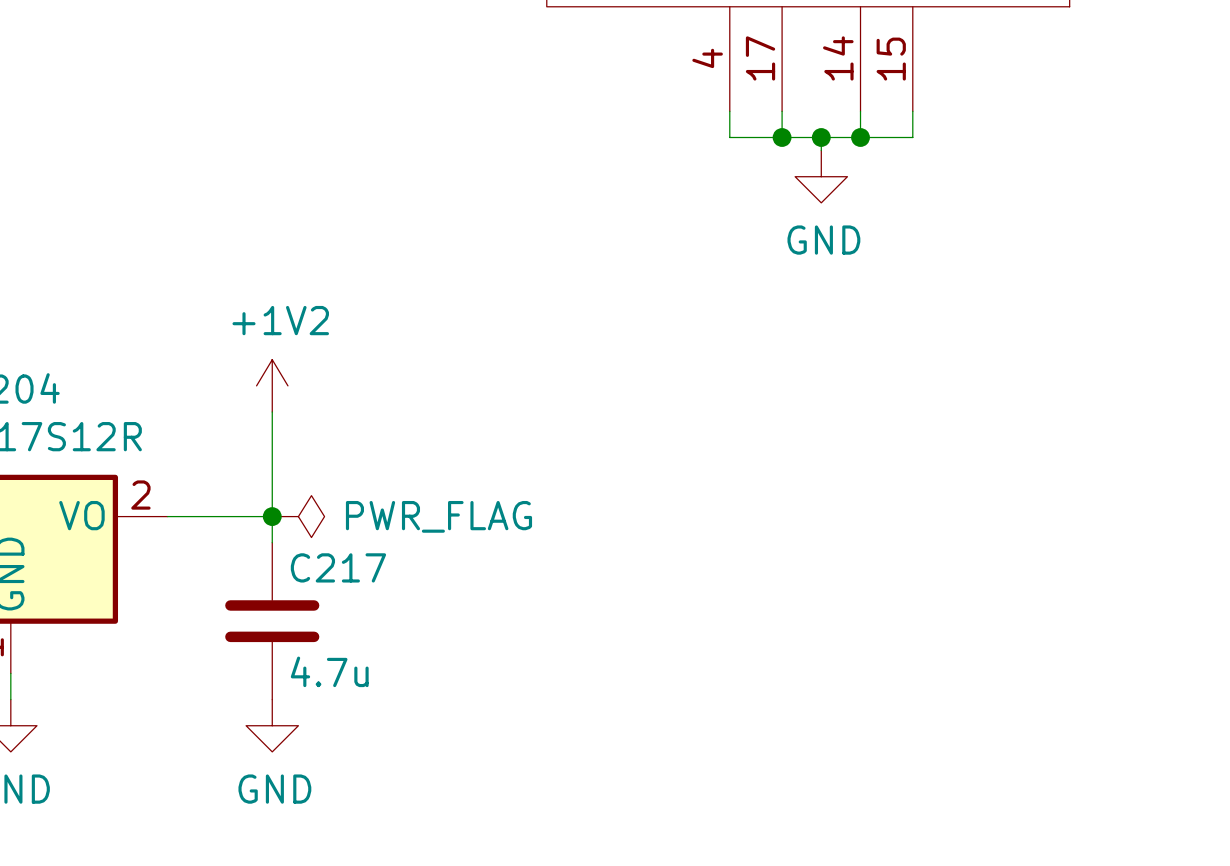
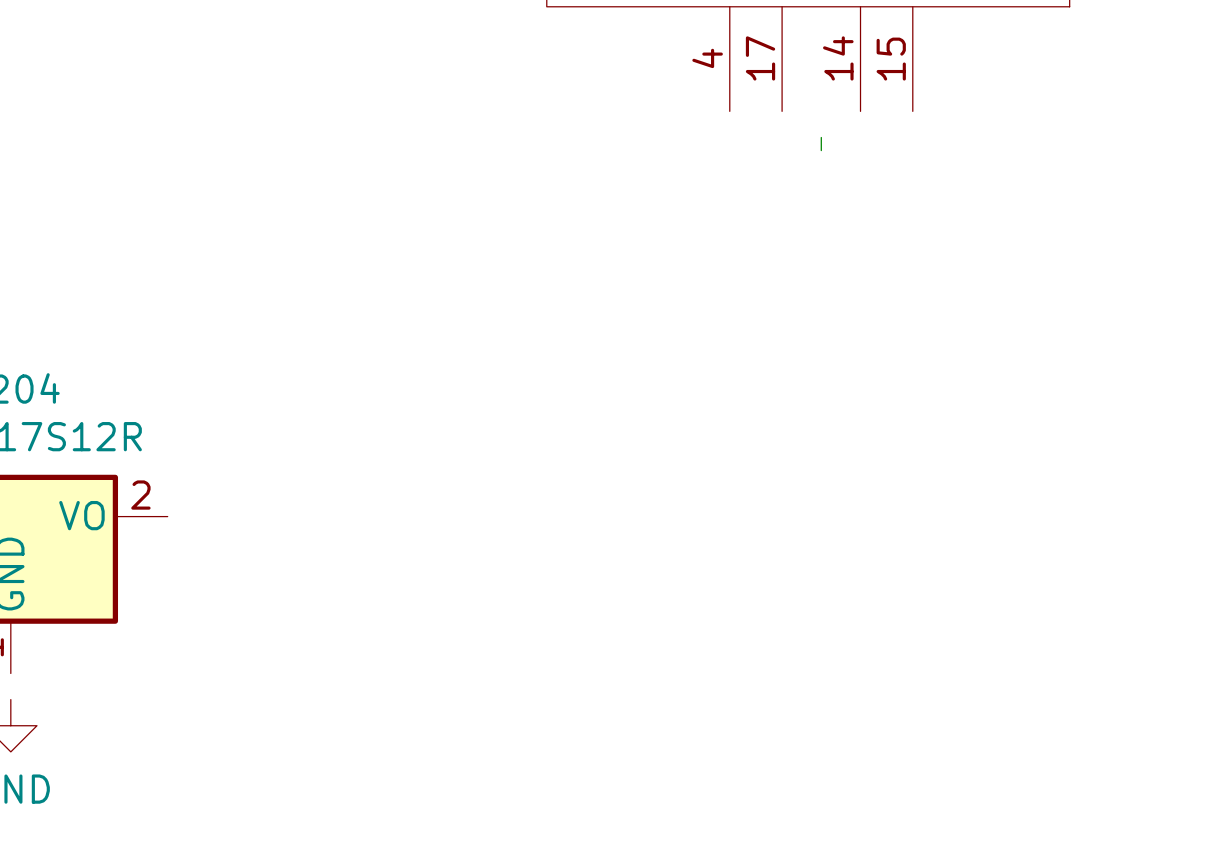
wire: (729, 111) (729, 137) (912, 137) (912, 111) -> none
wire: (782, 111) (782, 137) -> none
wire: (860, 111) (860, 137) -> none
junction: (782, 137) -> none
junction: (821, 137) -> none
junction: (860, 137) -> none
power symbol: GND (821, 176) -> none
power symbol: +1V2 (272, 385) -> none
wire: (272, 412) (272, 542) -> none
wire: (167, 516) (272, 516) -> none
junction: (272, 516) -> none
power symbol: PWR_FLAG (298, 516) -> none
C217: 4.7u (272, 621) -> none
wire: (10, 673) (10, 699) -> none
power symbol: GND (272, 725) -> none

